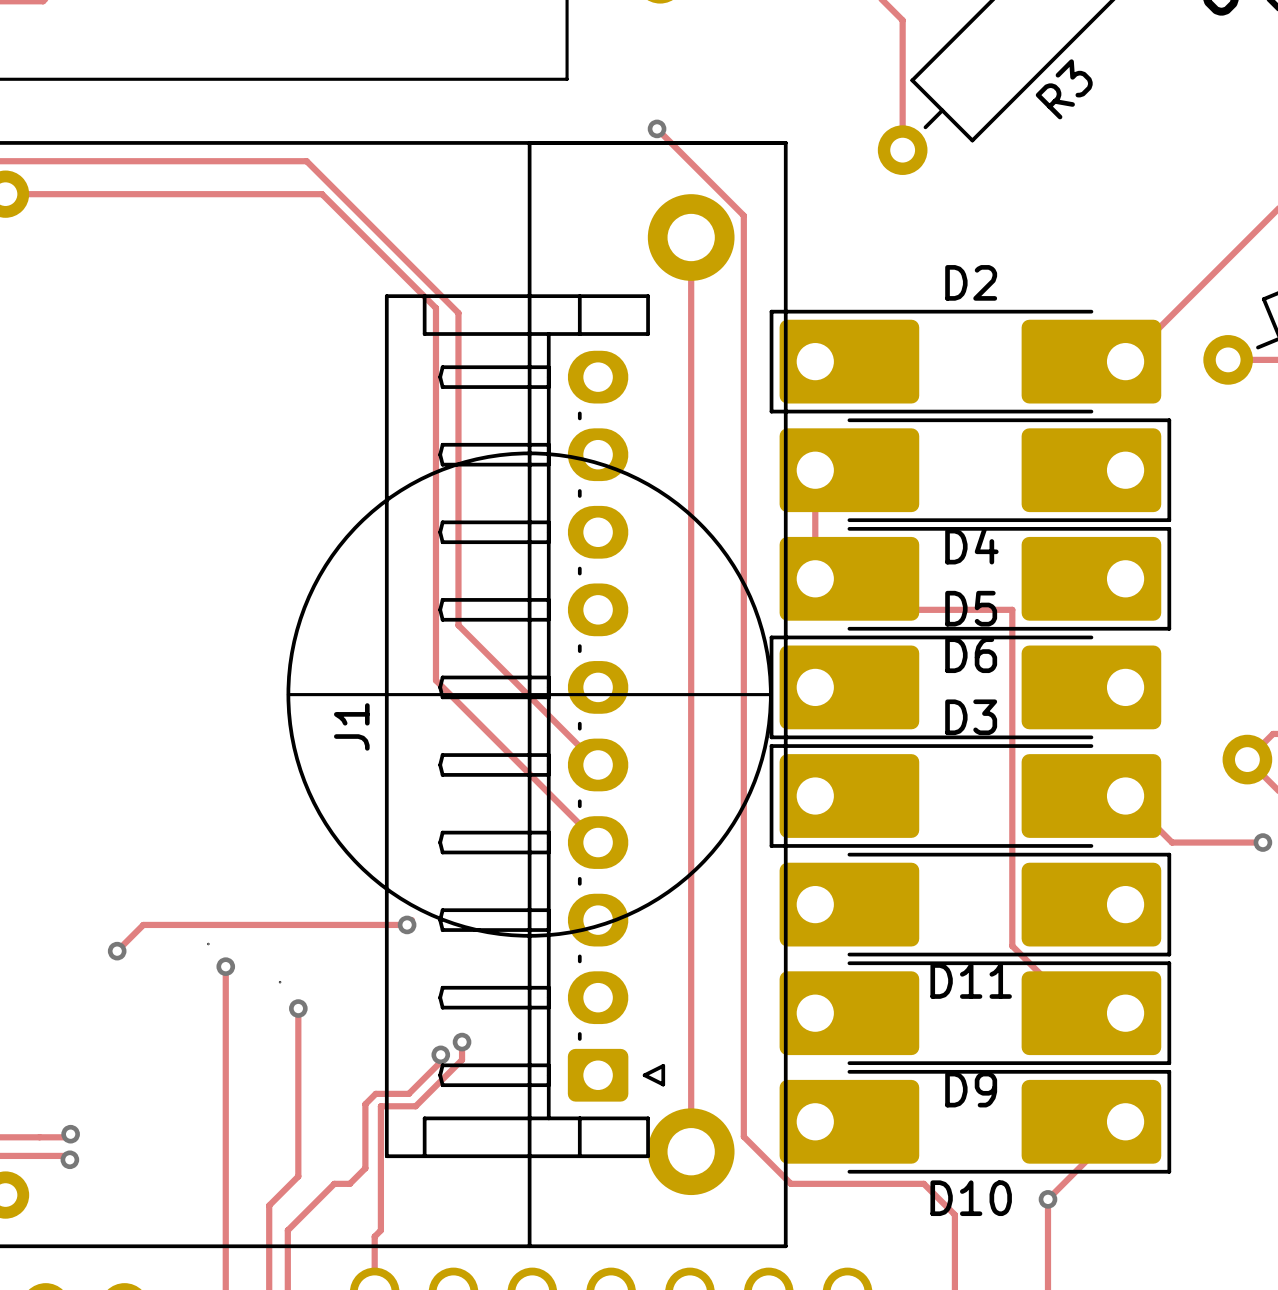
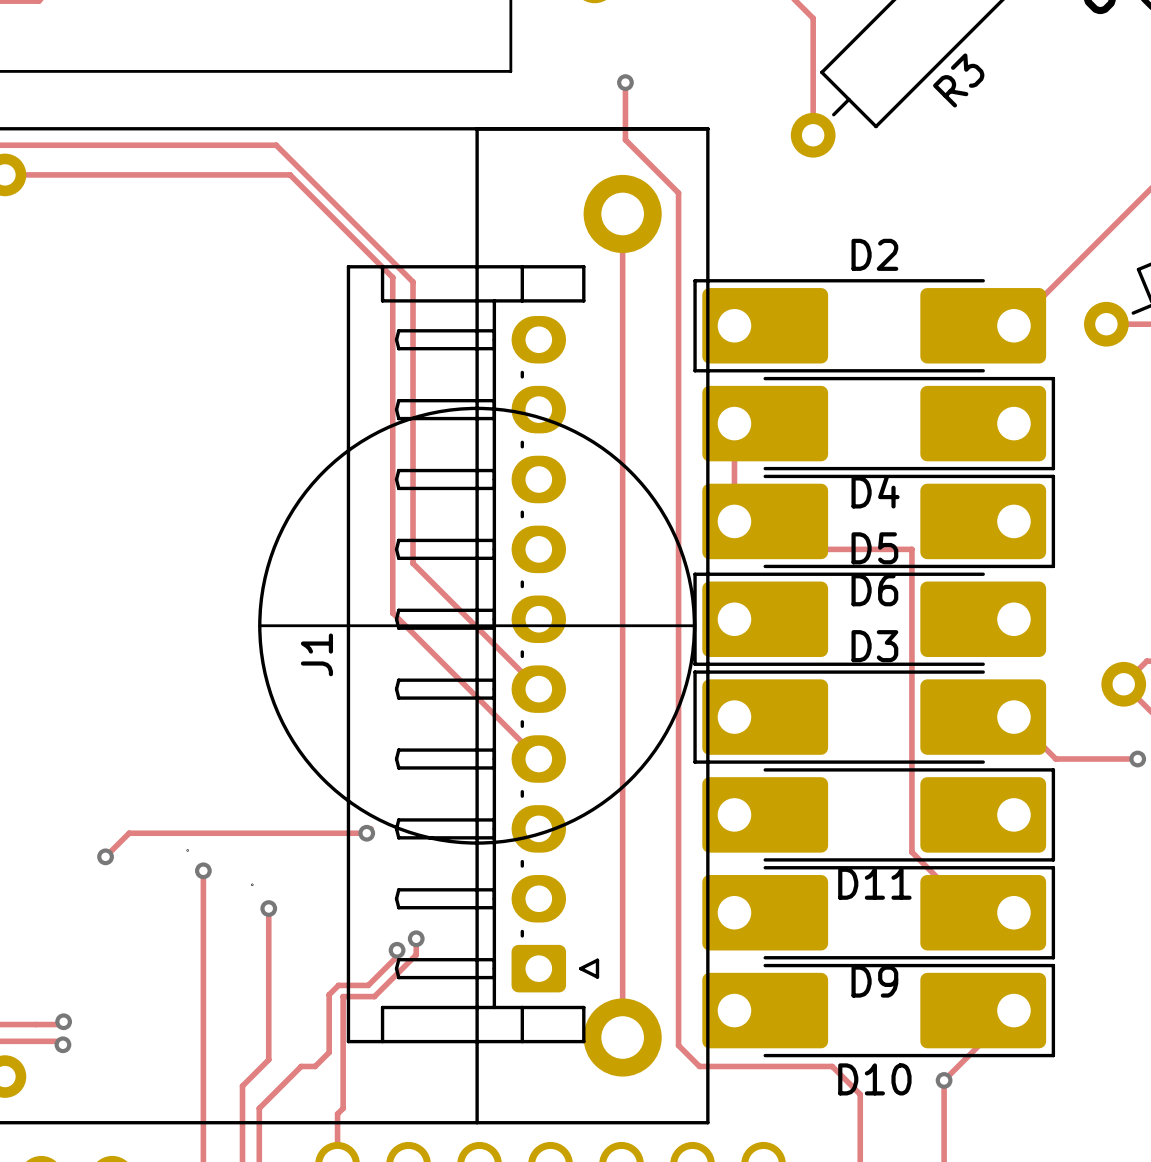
track: (657, 128) (743, 215) (743, 1136) (790, 1183) -> (625, 82) (625, 139) (678, 193) (678, 1045) (699, 1066) (712, 1066)
via position: (657, 128) -> (625, 82)

